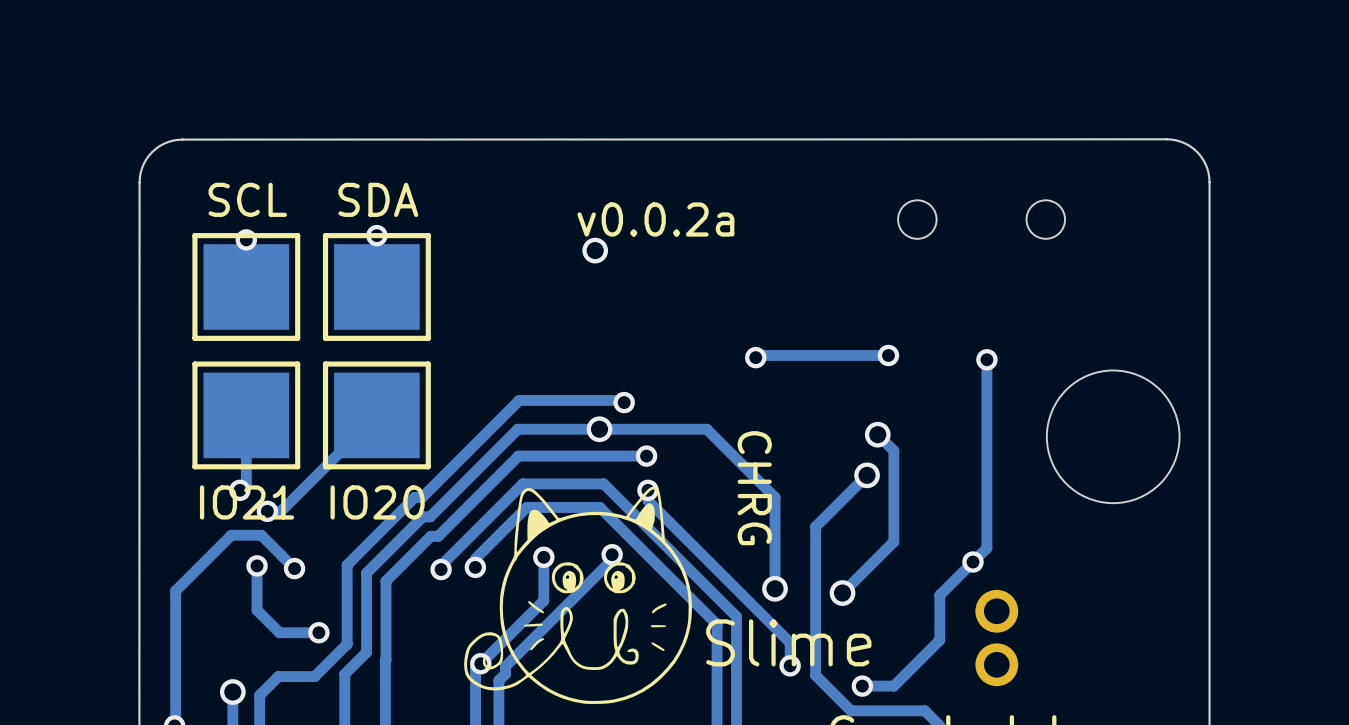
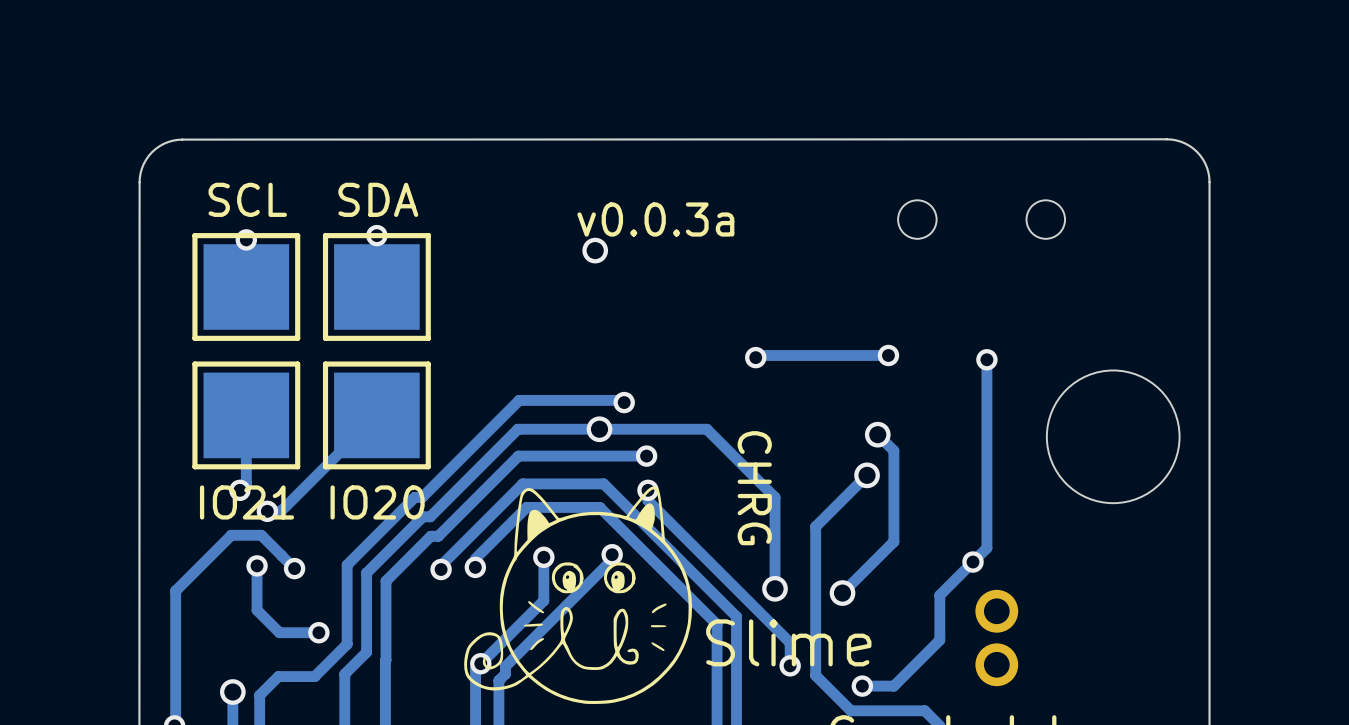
text: v0.0.2a (655, 219) -> v0.0.3a (655, 219)

